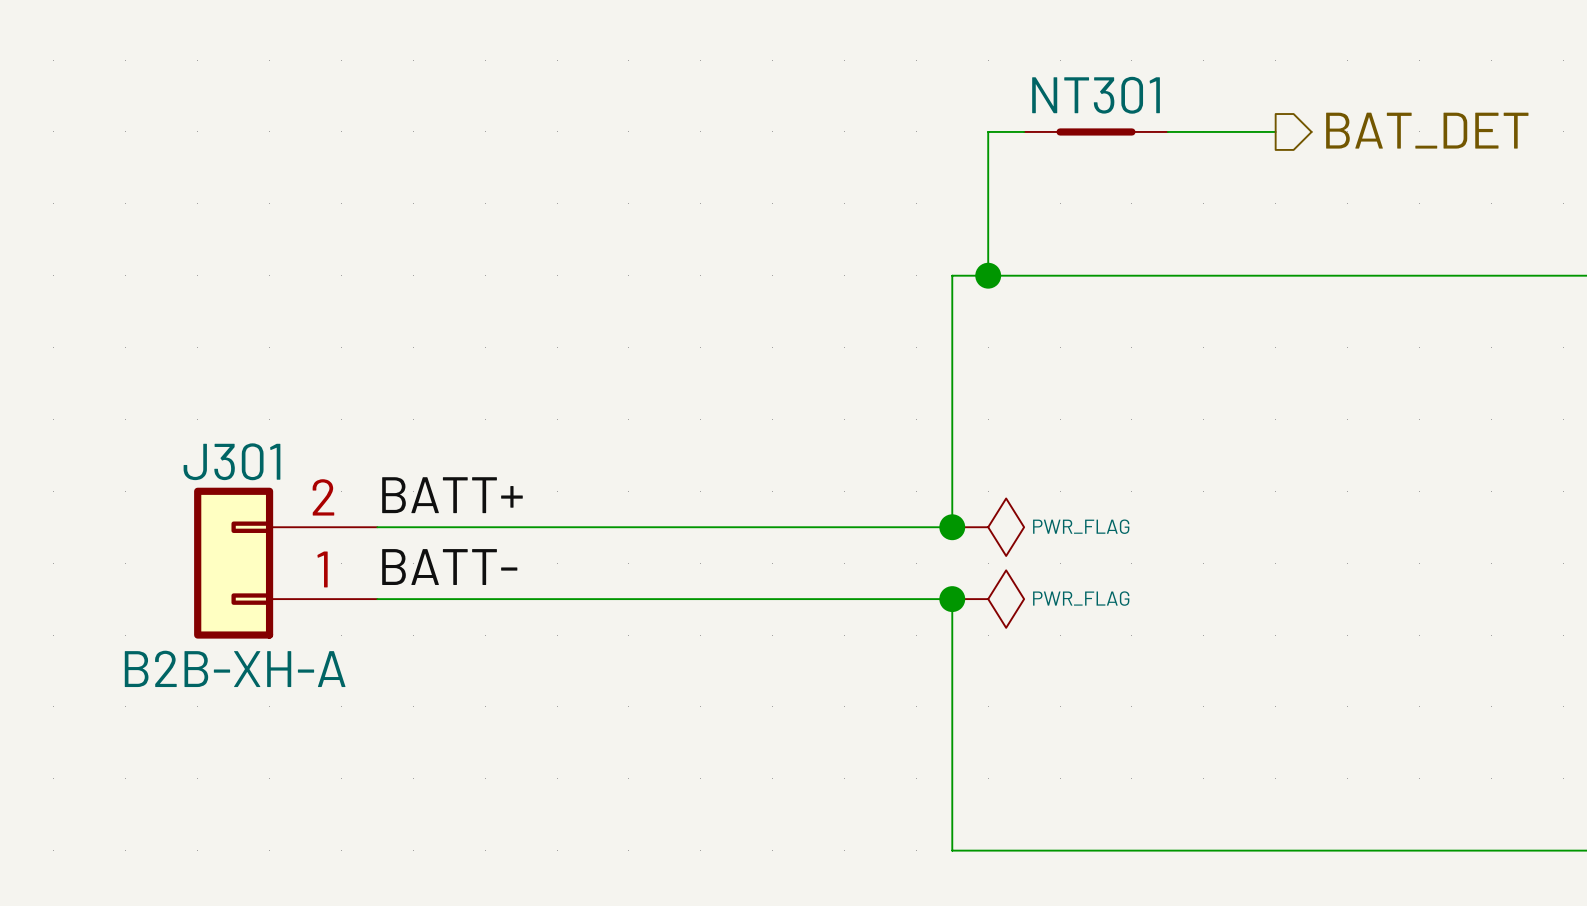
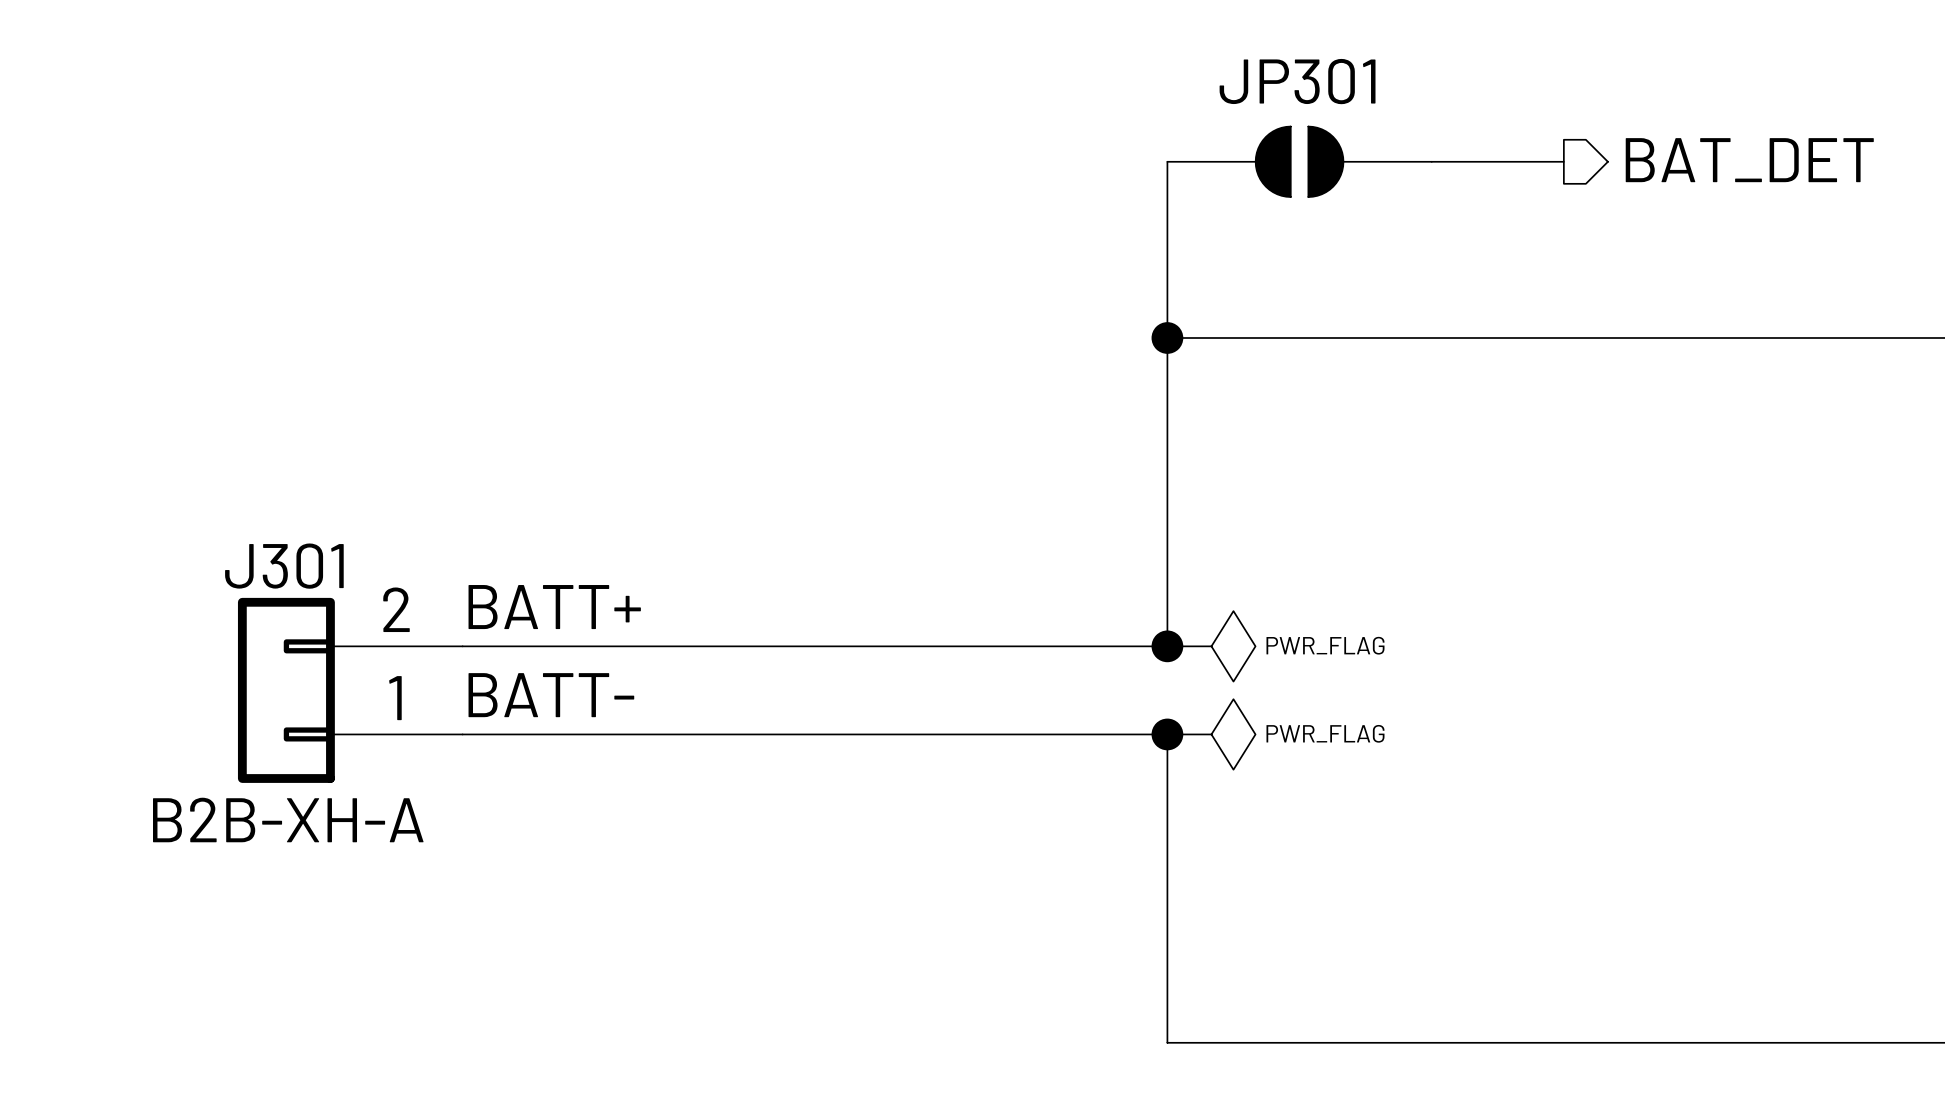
wire: none -> (1167, 161) (1167, 338)
wire: (1024, 131) (988, 131) (988, 275) -> none
JP301: none -> (1299, 161)
NT301: (1096, 131) -> none
junction position: (988, 275) -> (1167, 338)

